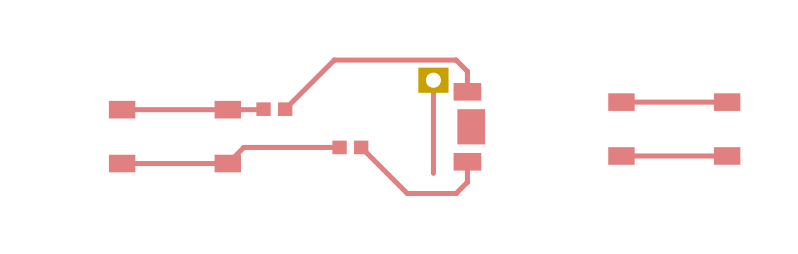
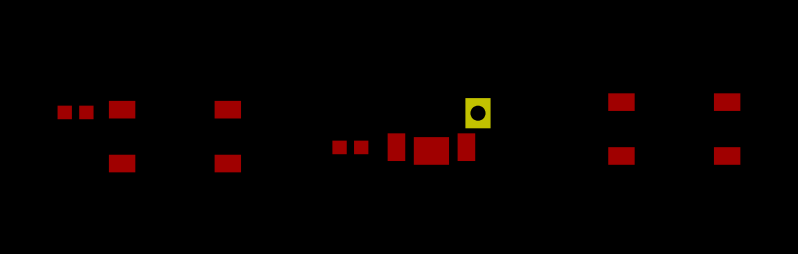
top track: (433, 80) (433, 173) -> none
top track: (467, 91) (467, 71) (456, 60) (334, 60) (285, 109) -> none
top track: (727, 102) (621, 102) -> none
top track: (263, 109) (122, 109) -> none
part position: (274, 109) -> (75, 112)
part rotation: 0° (451, 119) -> 90° clockwise (439, 131)
top track: (339, 147) (243, 147) (227, 163) (122, 163) -> none
top track: (361, 147) (407, 193) (456, 193) (467, 182) (467, 161) -> none
top track: (727, 155) (621, 155) -> none

